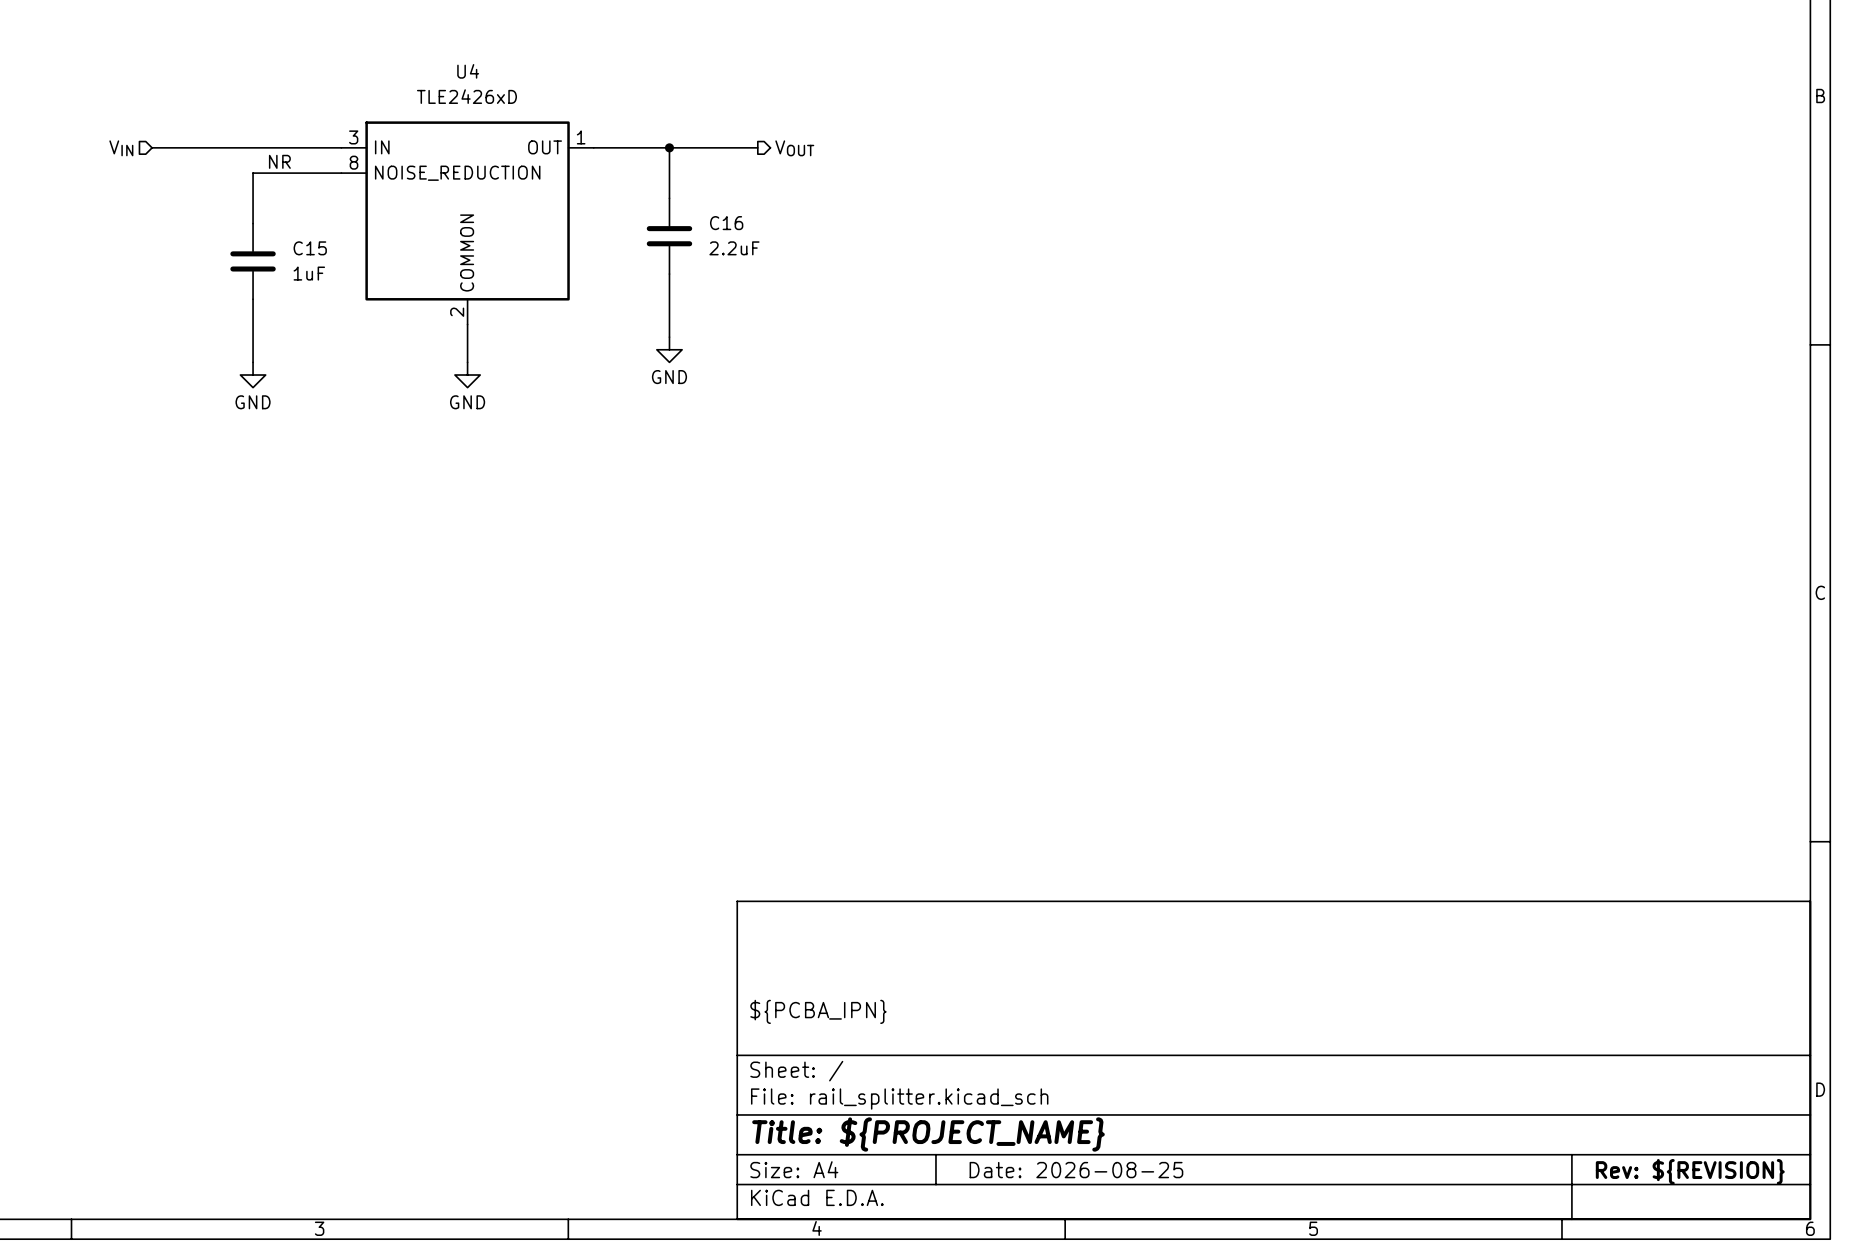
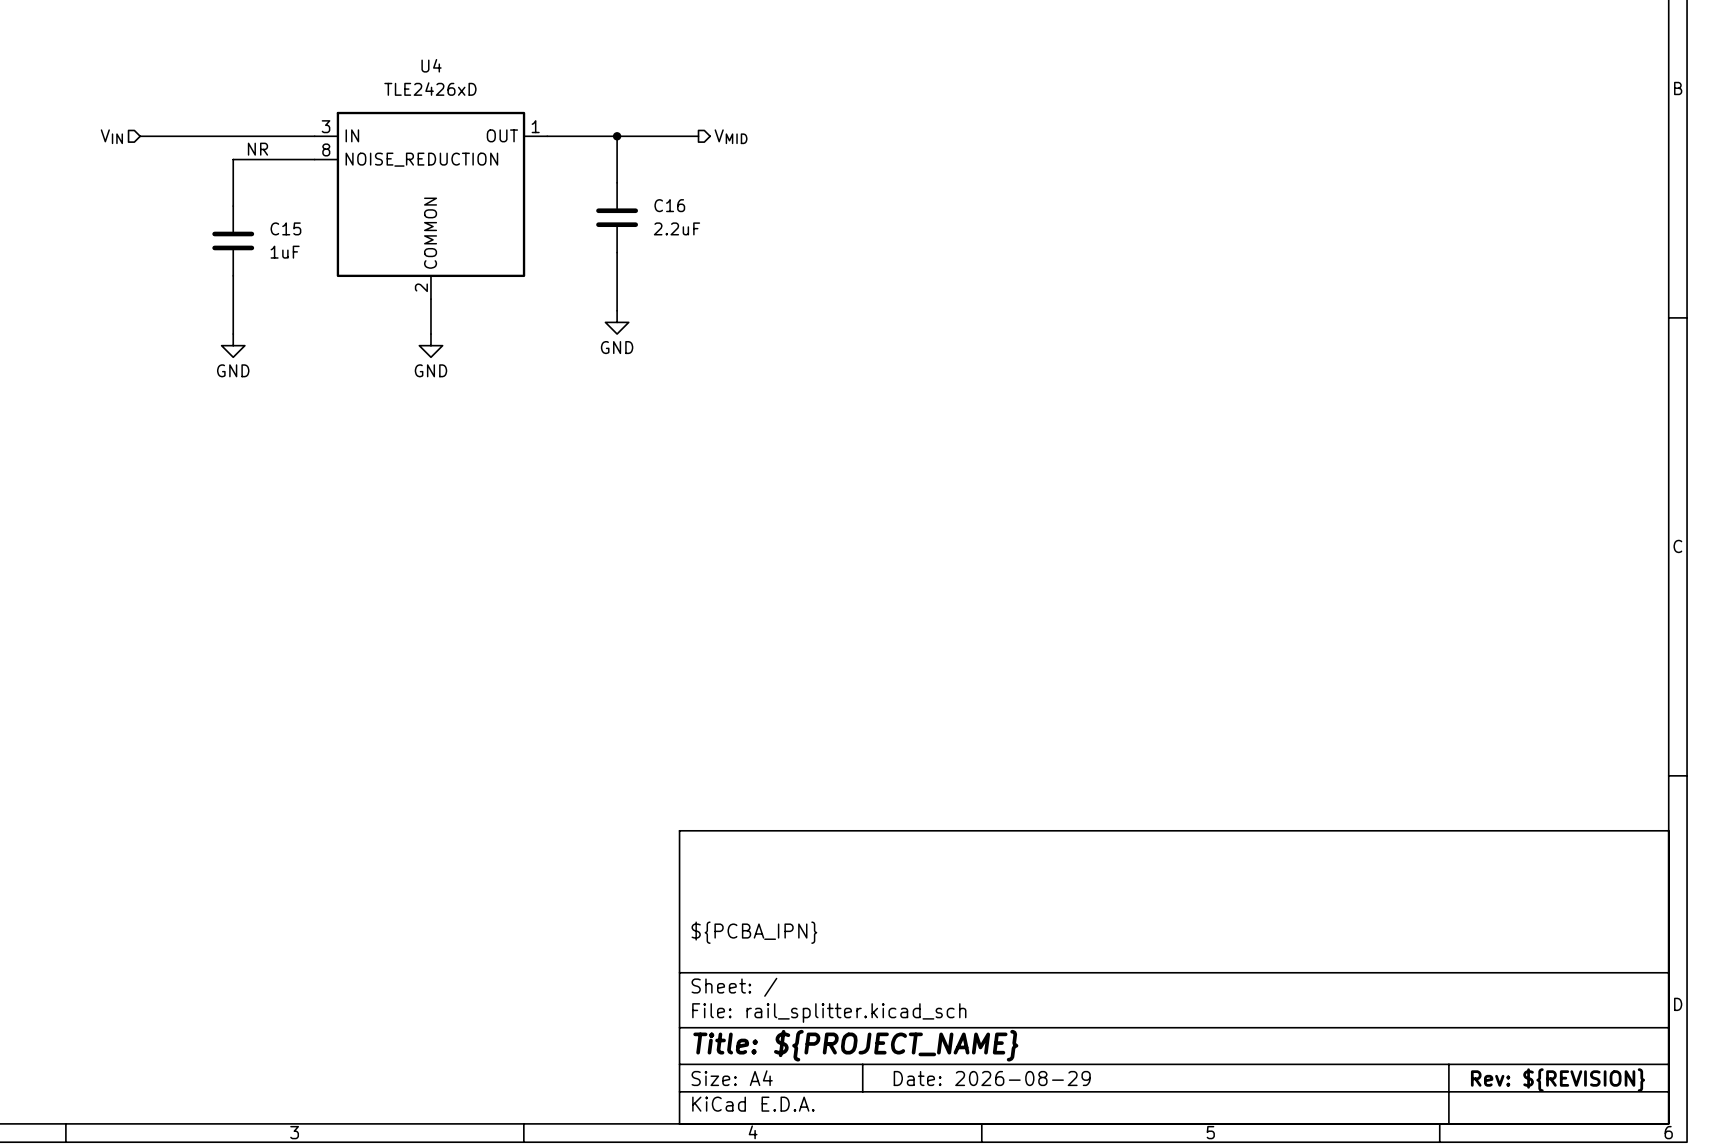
hierarchical label: VOUT (794, 148) -> VMID (731, 136)
title block: Date: 2026-08-25 (1076, 1170) -> Date: 2026-08-29 (992, 1078)

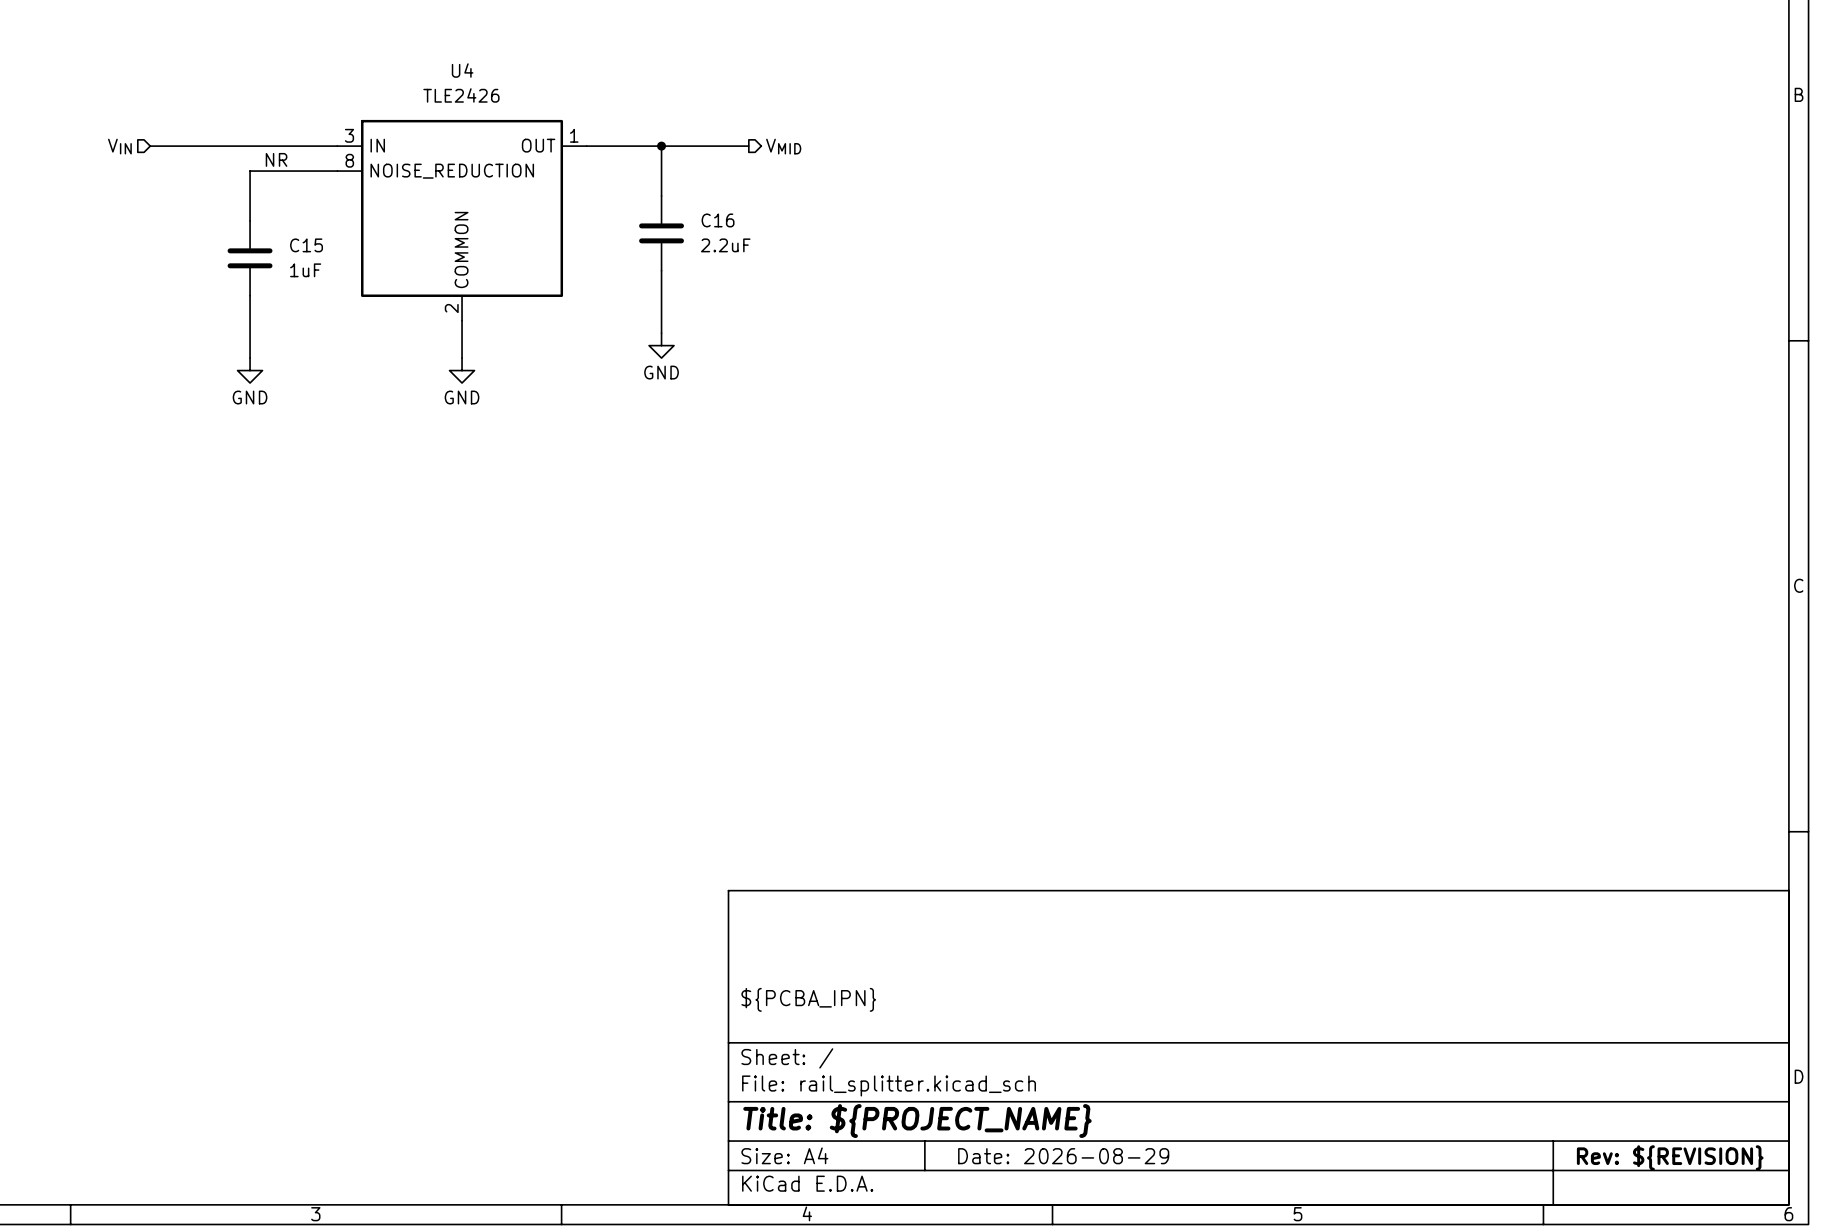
U4 value: TLE2426xD (430, 89) -> TLE2426 (461, 95)

